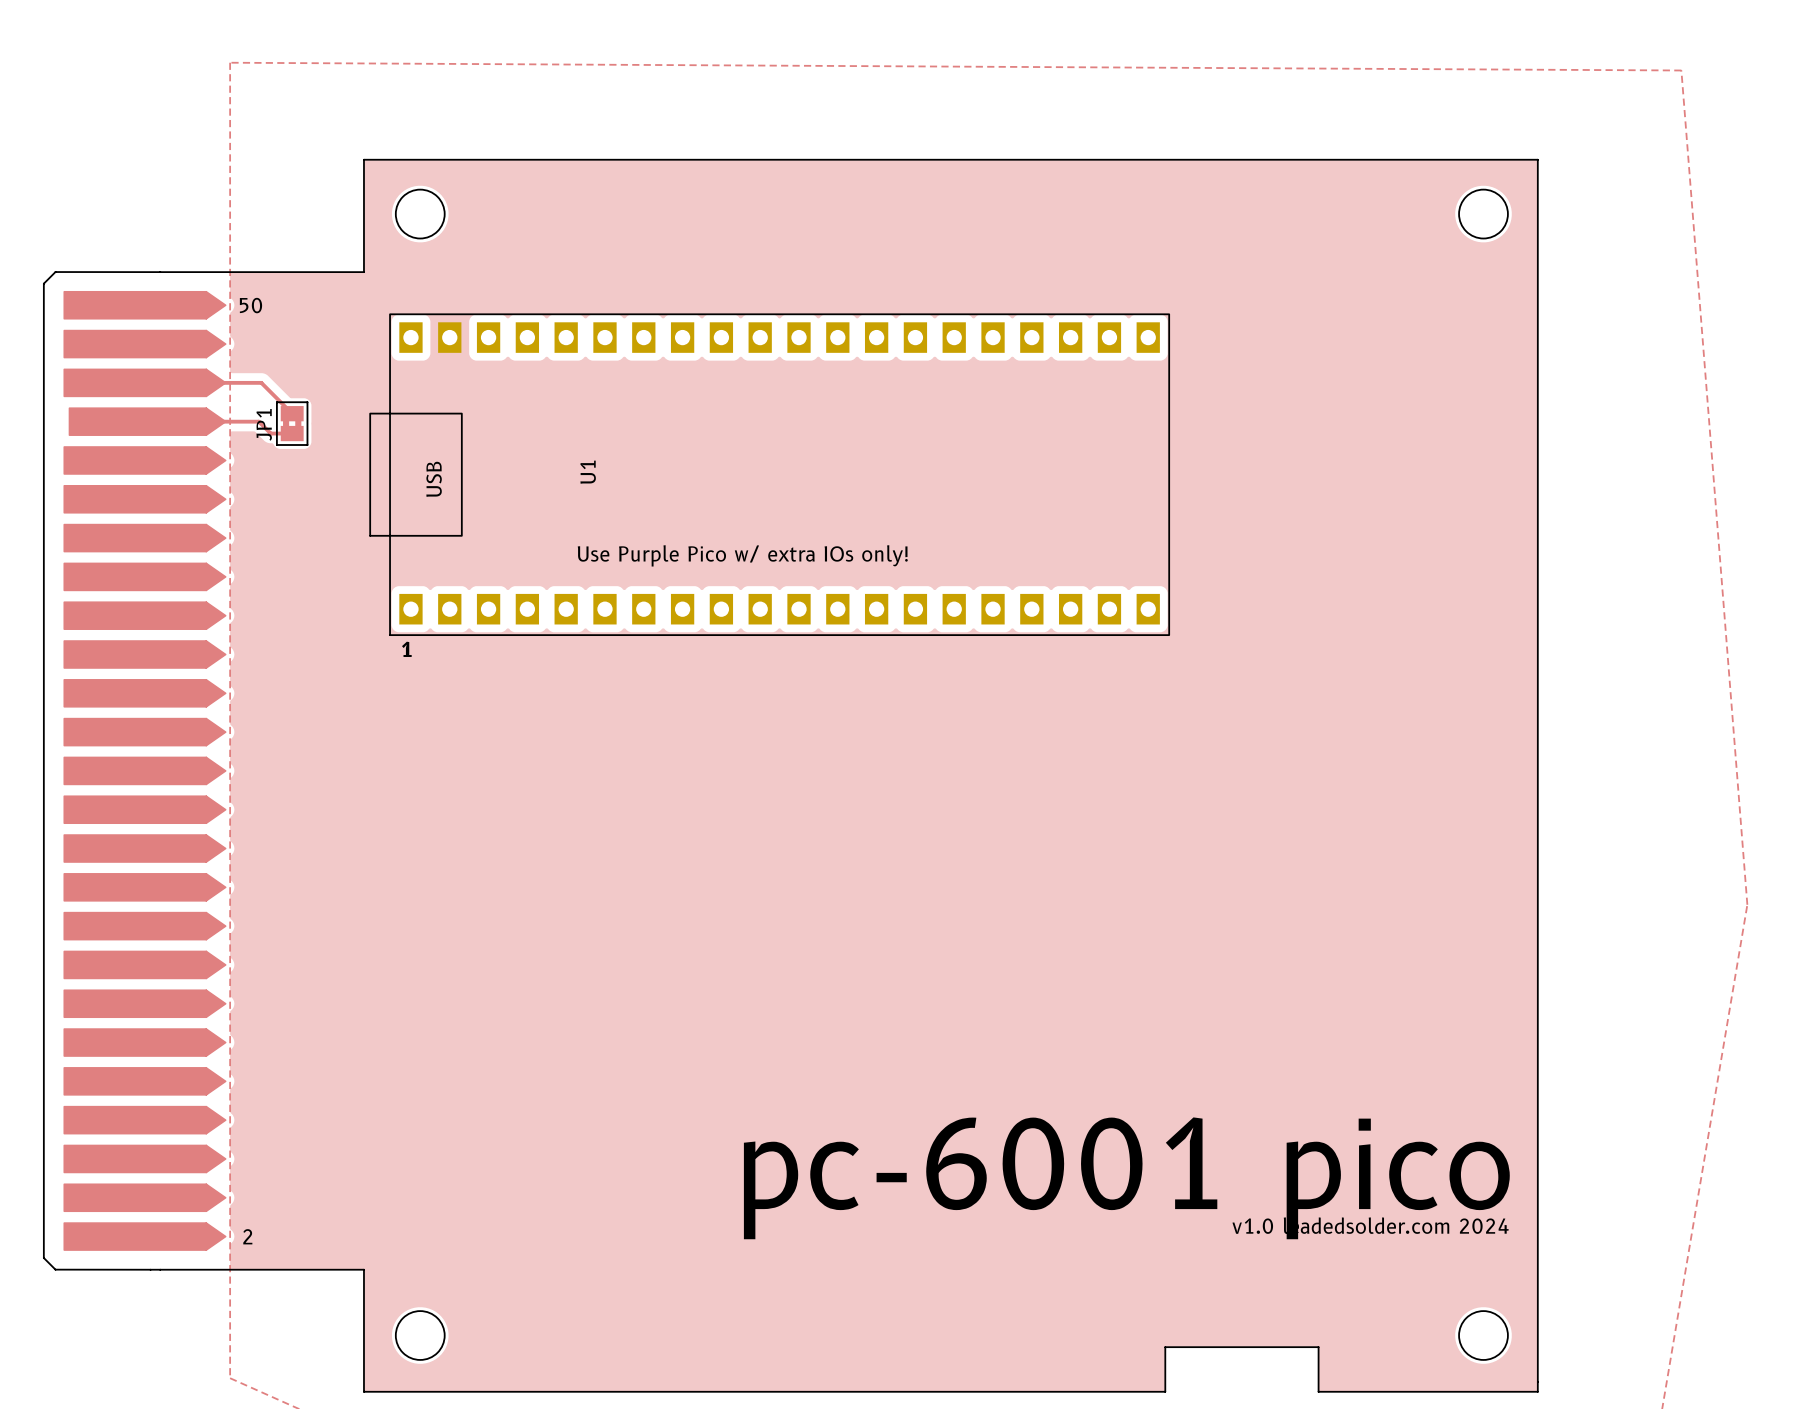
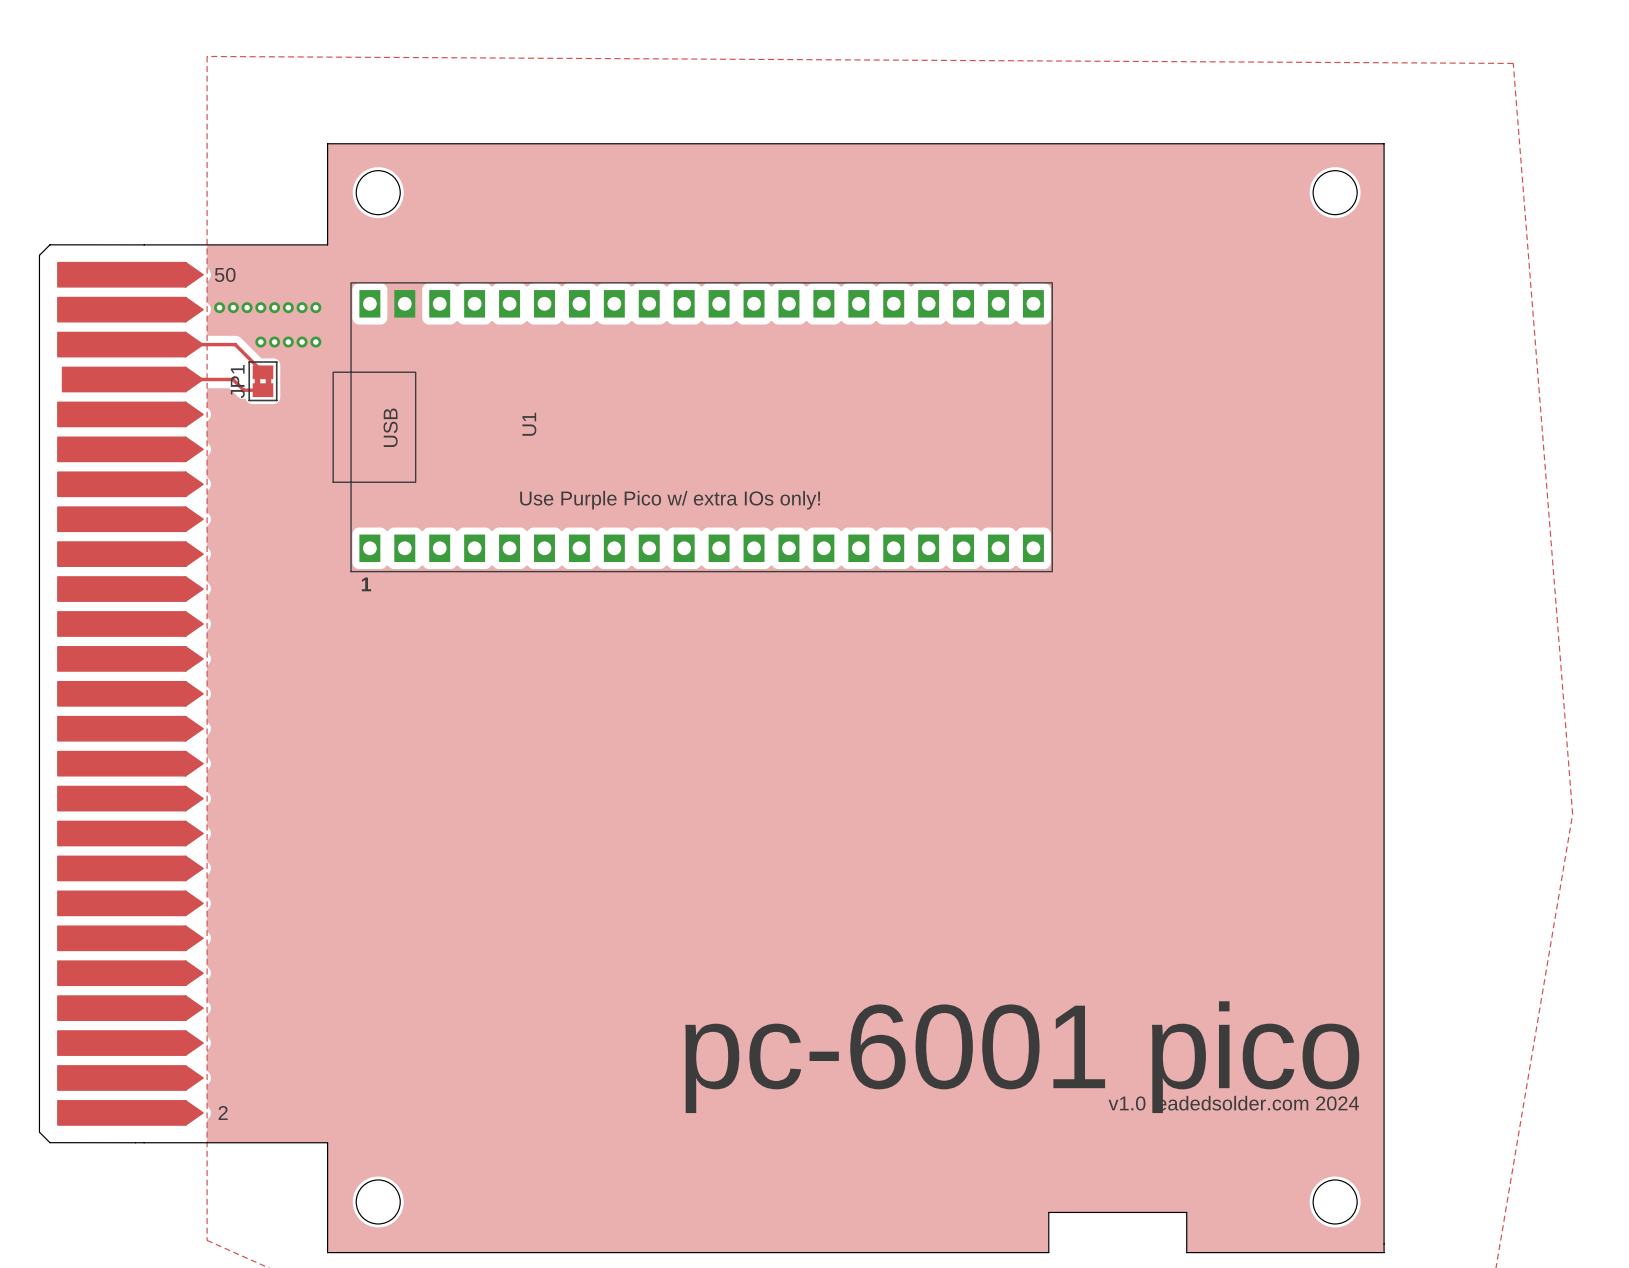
via: none -> (219, 307)
via: none -> (233, 307)
via: none -> (247, 307)
via: none -> (260, 307)
via: none -> (274, 307)
via: none -> (288, 307)
via: none -> (302, 307)
via: none -> (315, 307)
via: none -> (260, 342)
via: none -> (274, 342)
via: none -> (288, 342)
via: none -> (302, 342)
via: none -> (315, 342)

